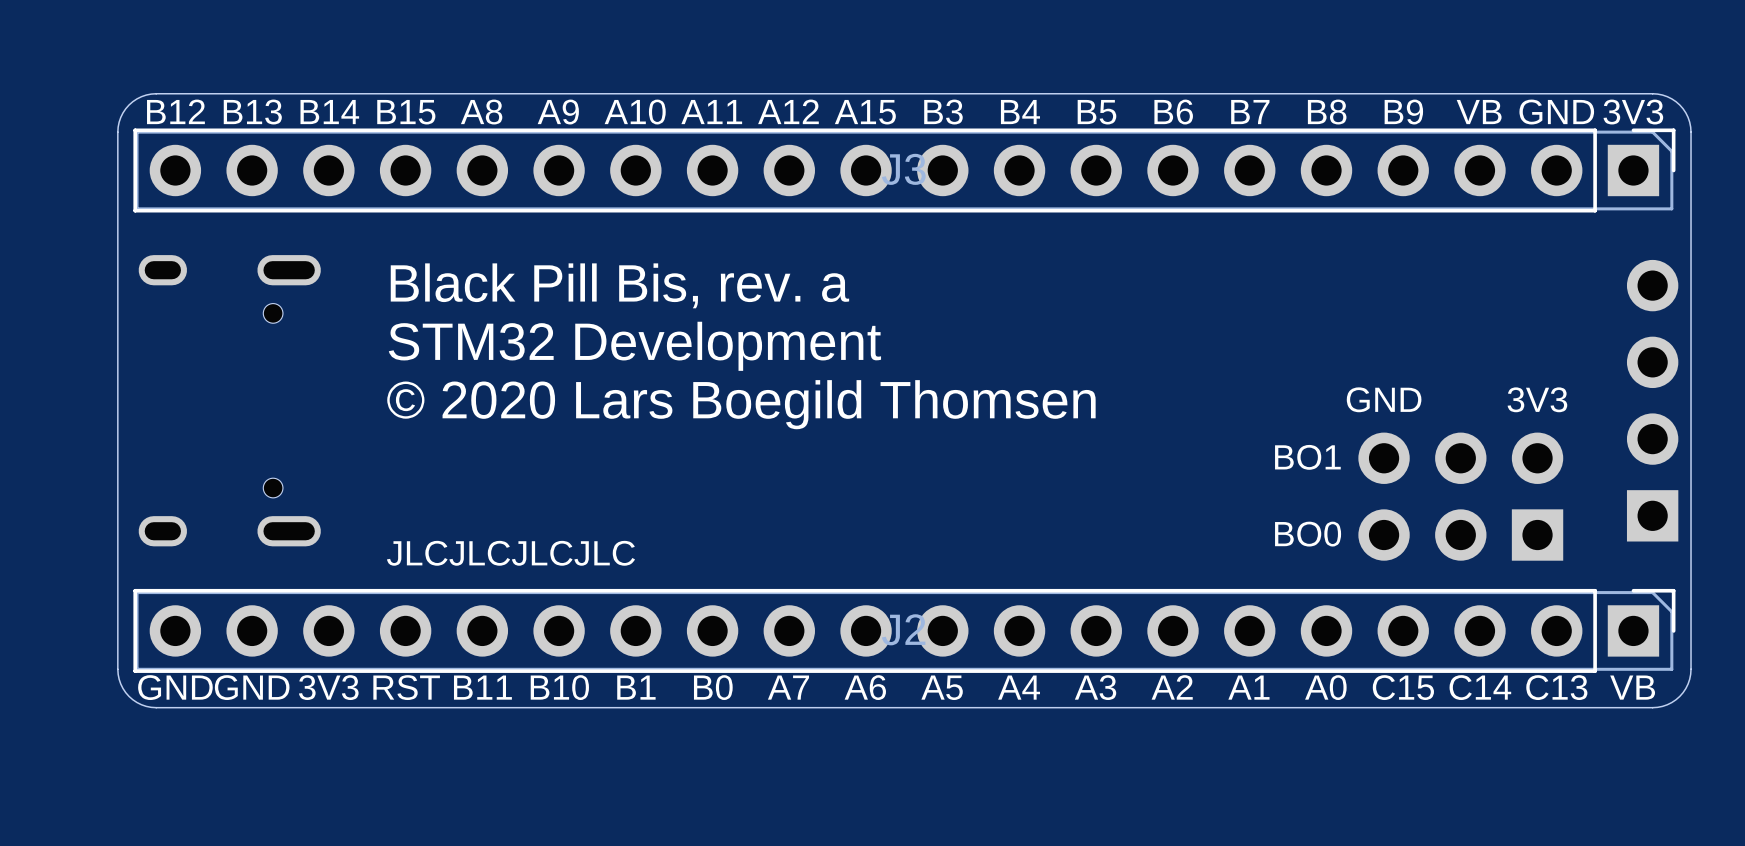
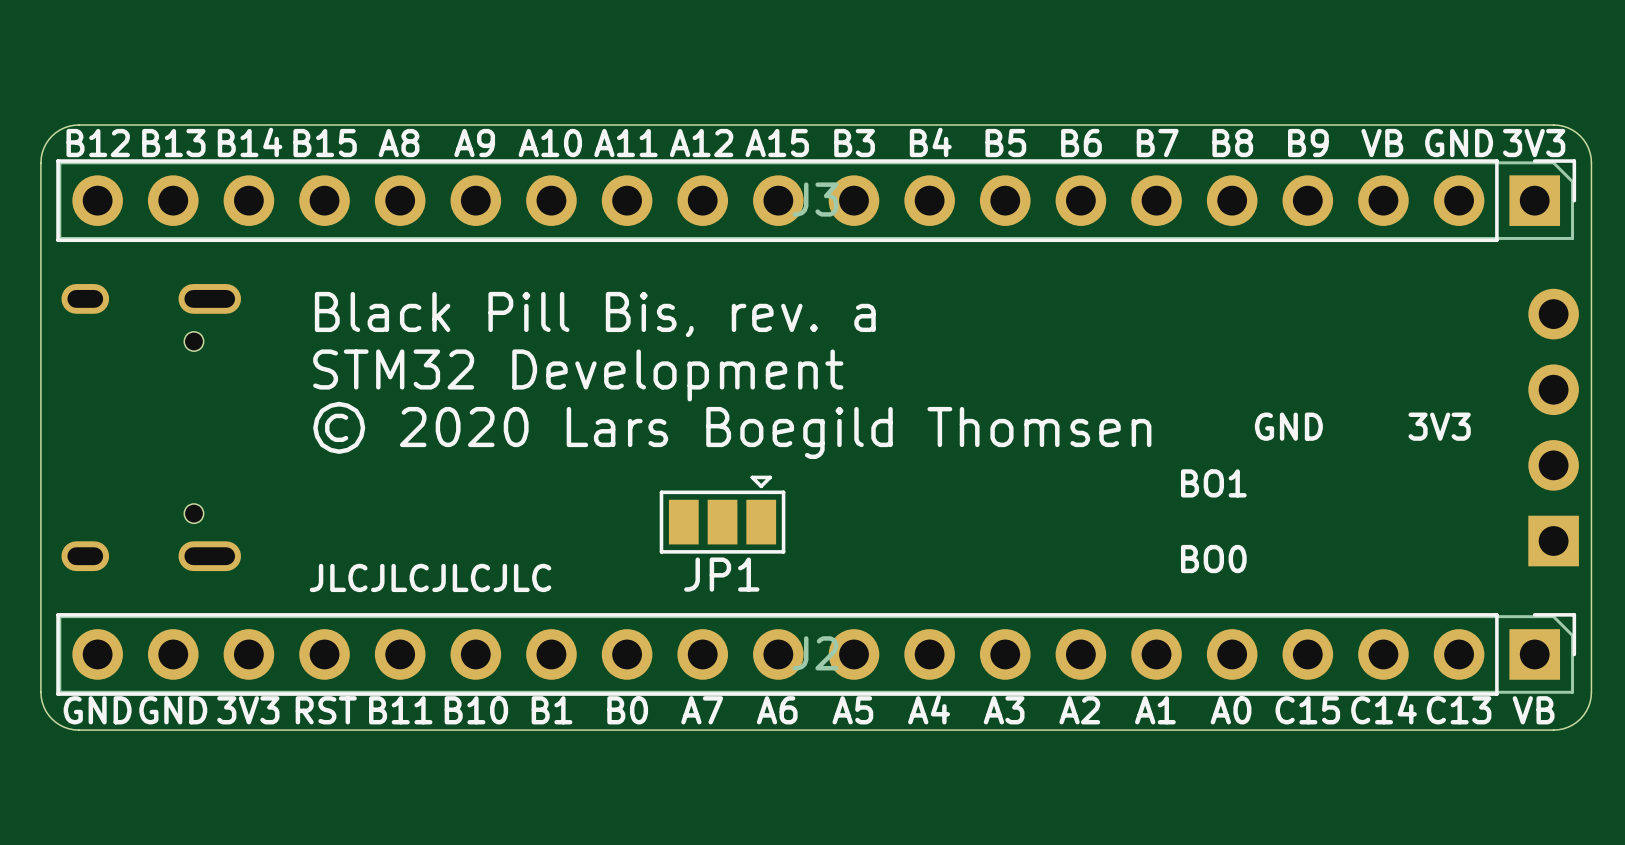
JP1: none -> (722, 514)
part: (1460, 496) -> none

